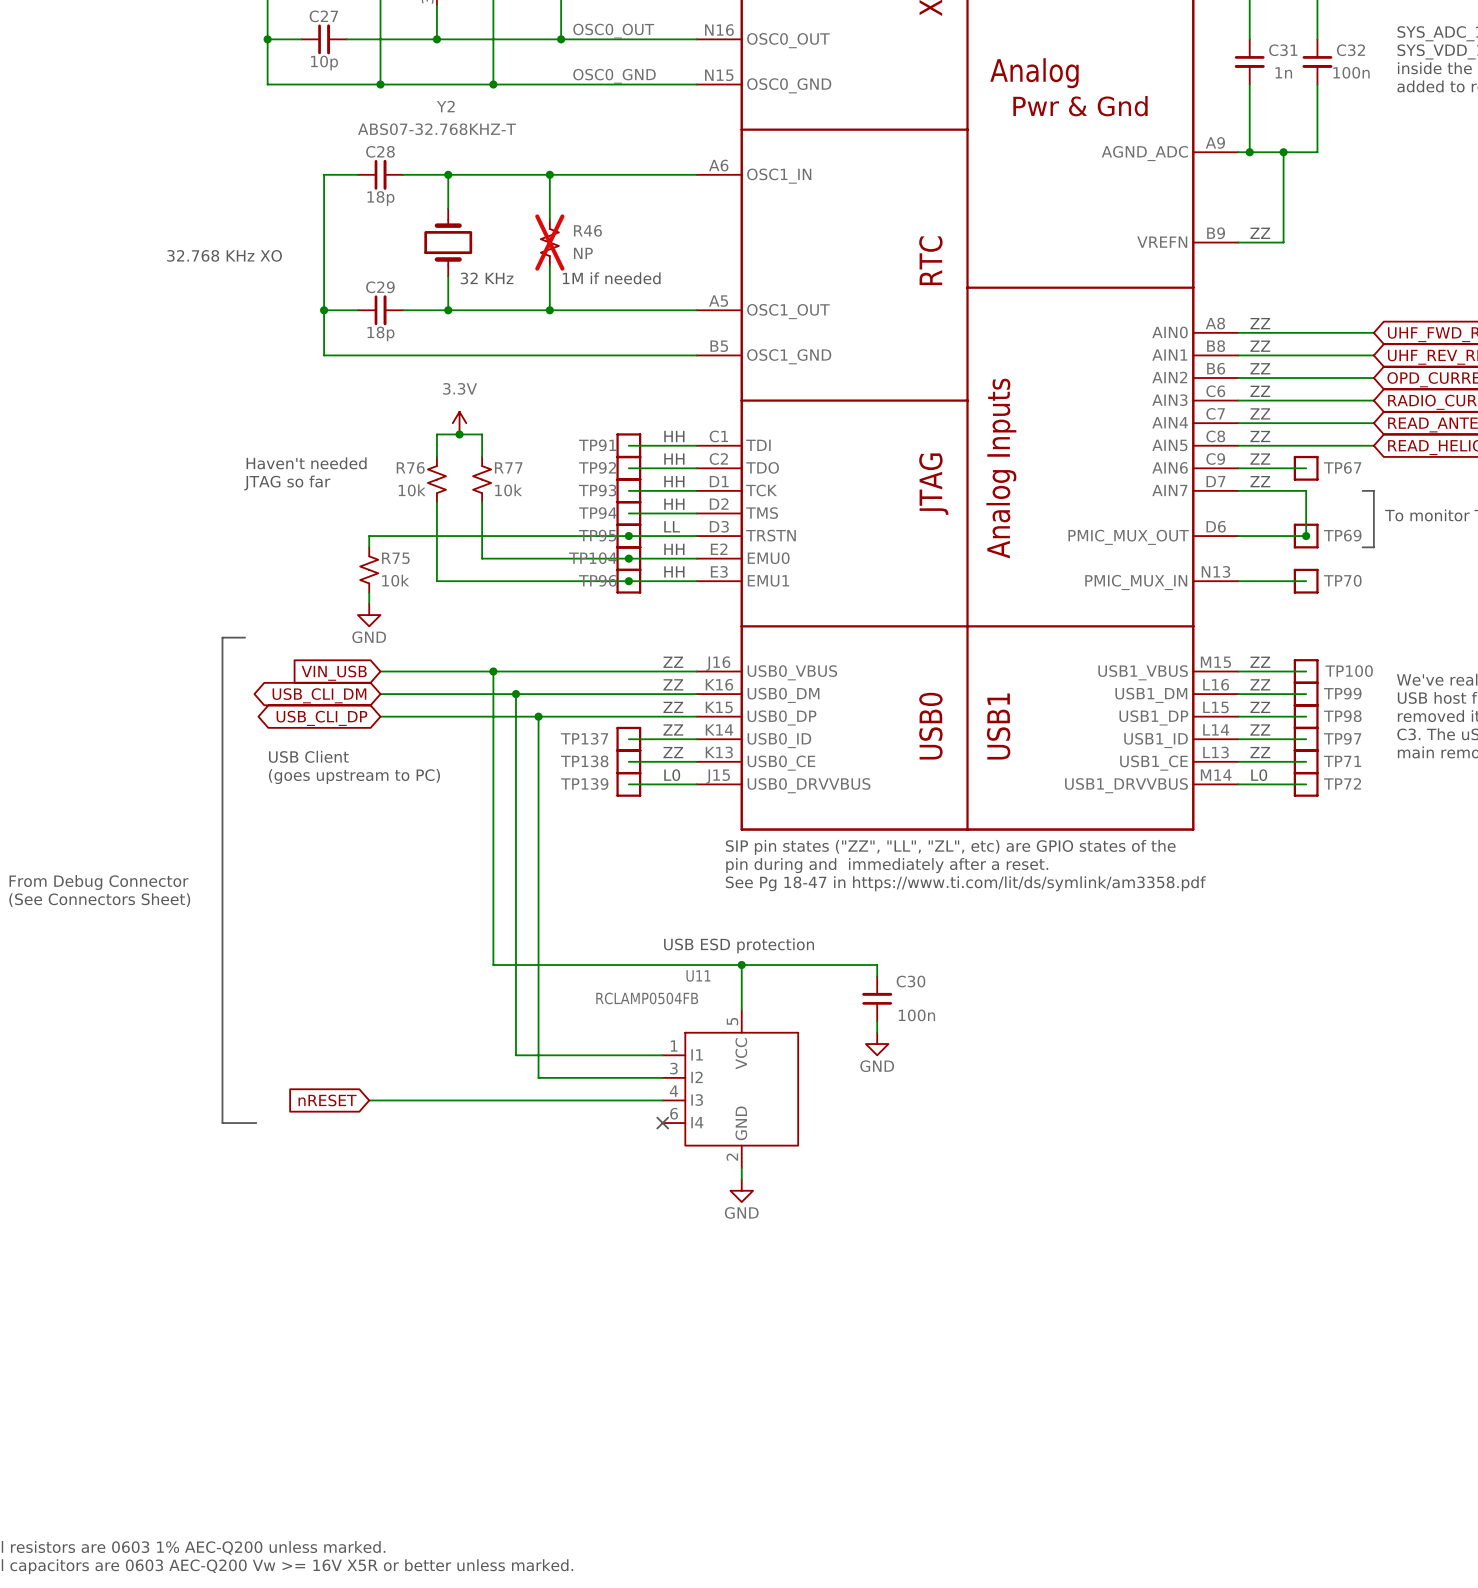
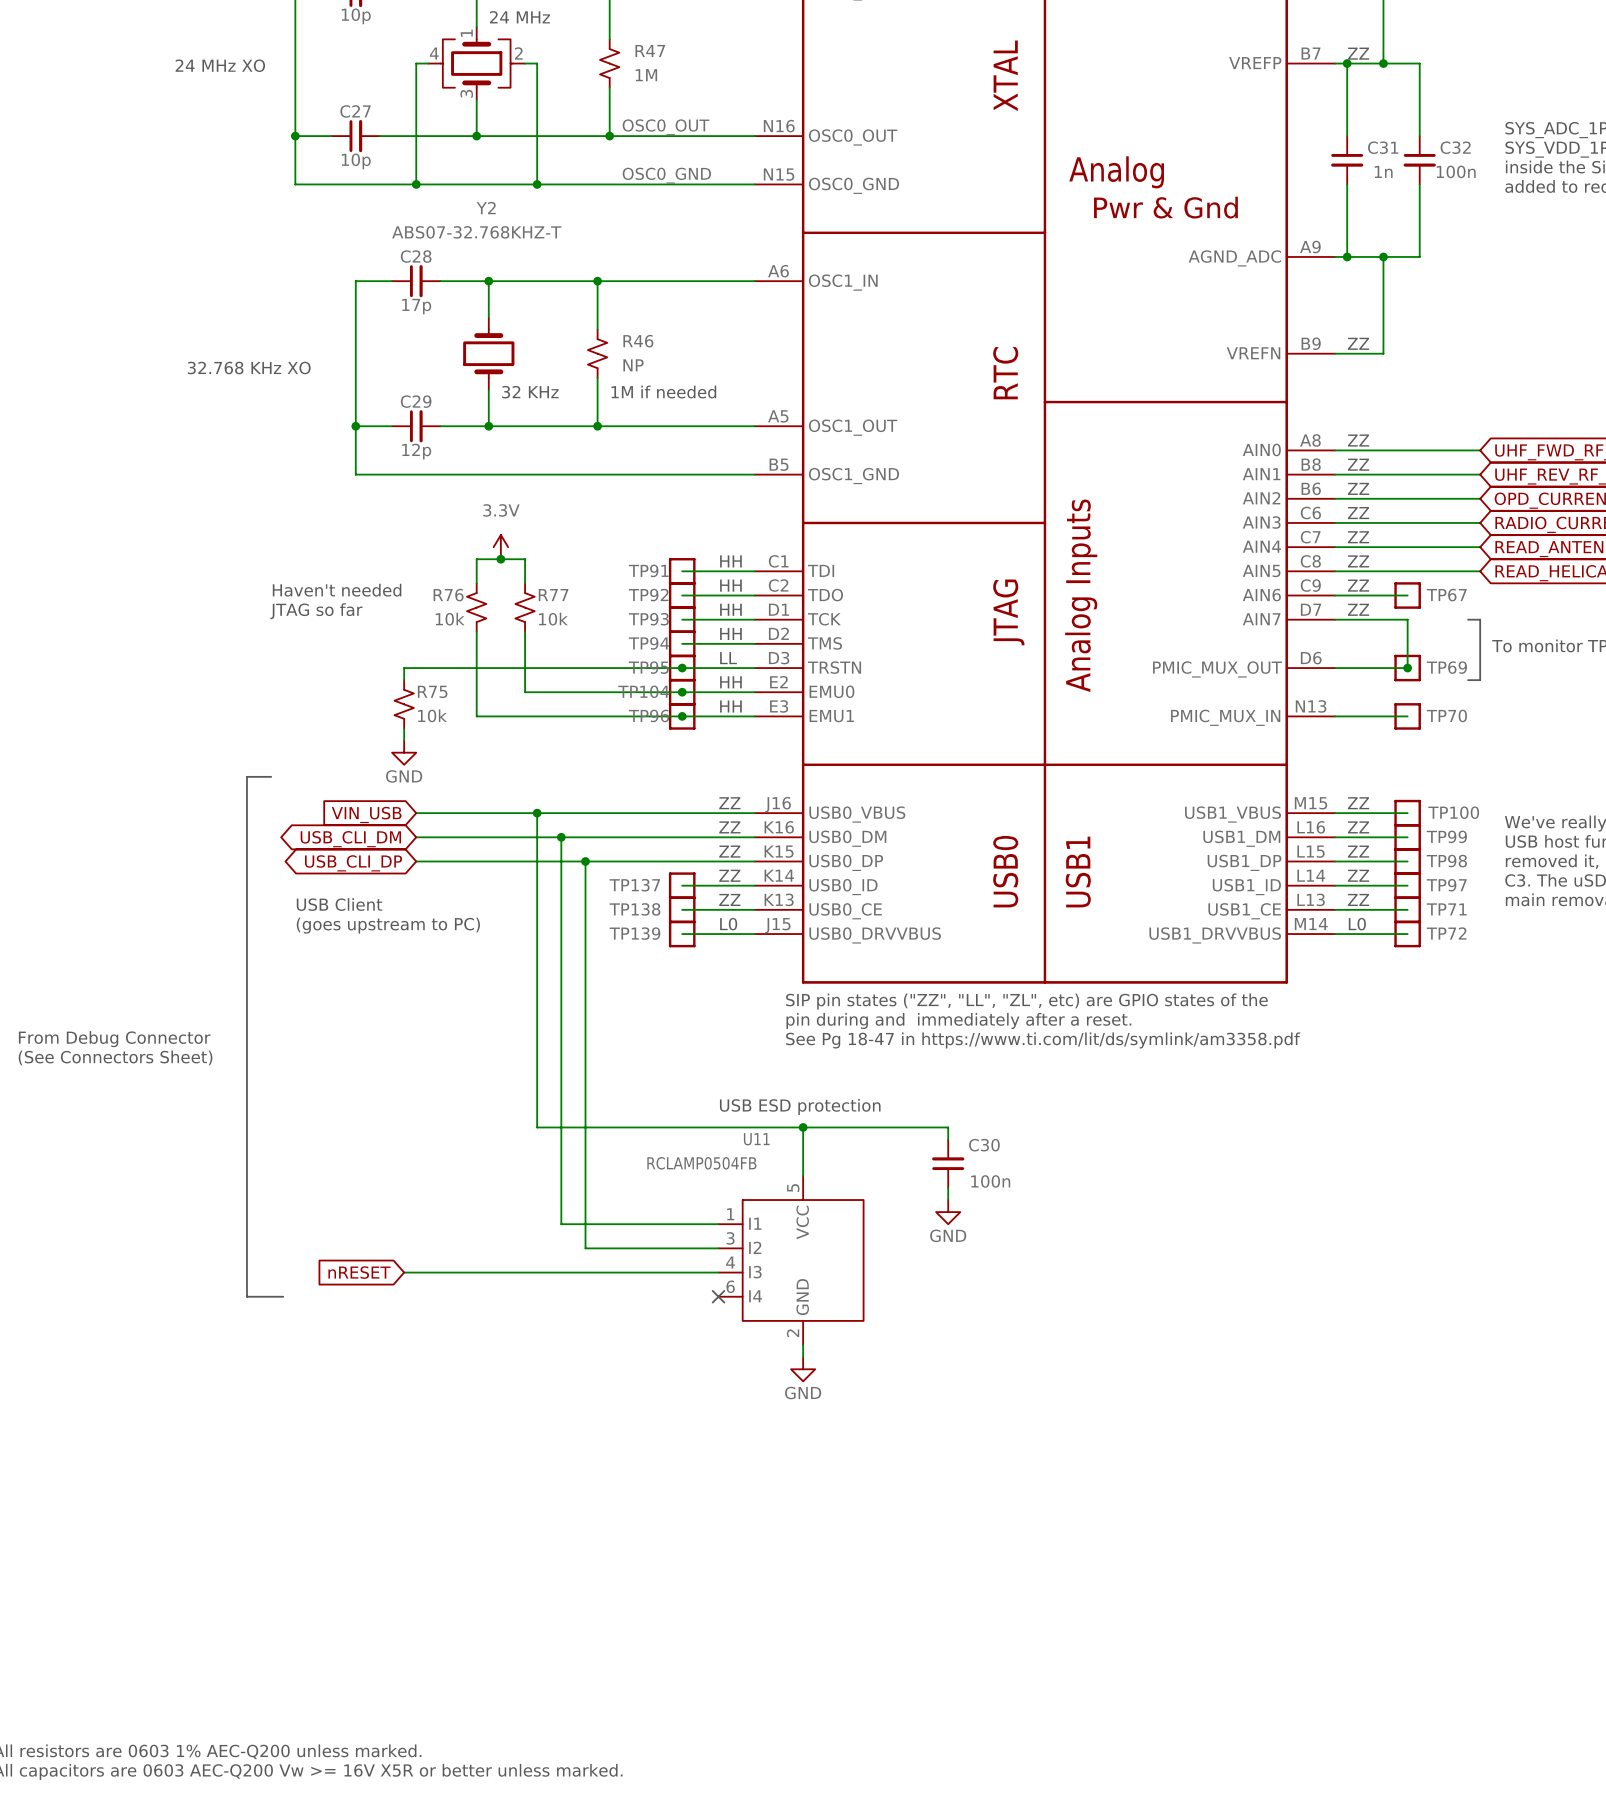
C28 value: 18p (380, 198) -> 17p (416, 306)
R46 do-not-place cross: (549, 242) -> none
C29 value: 18p (380, 333) -> 12p (416, 451)

